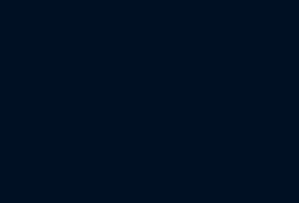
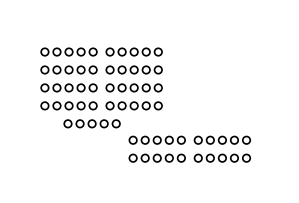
part: none -> (69, 52)
part: none -> (134, 52)
part: none -> (69, 69)
part: none -> (134, 69)
part: none -> (69, 87)
part: none -> (134, 87)
part: none -> (69, 105)
part: none -> (134, 105)
part: none -> (92, 123)
part: none -> (157, 140)
part: none -> (222, 140)
part: none -> (157, 158)
part: none -> (222, 158)

